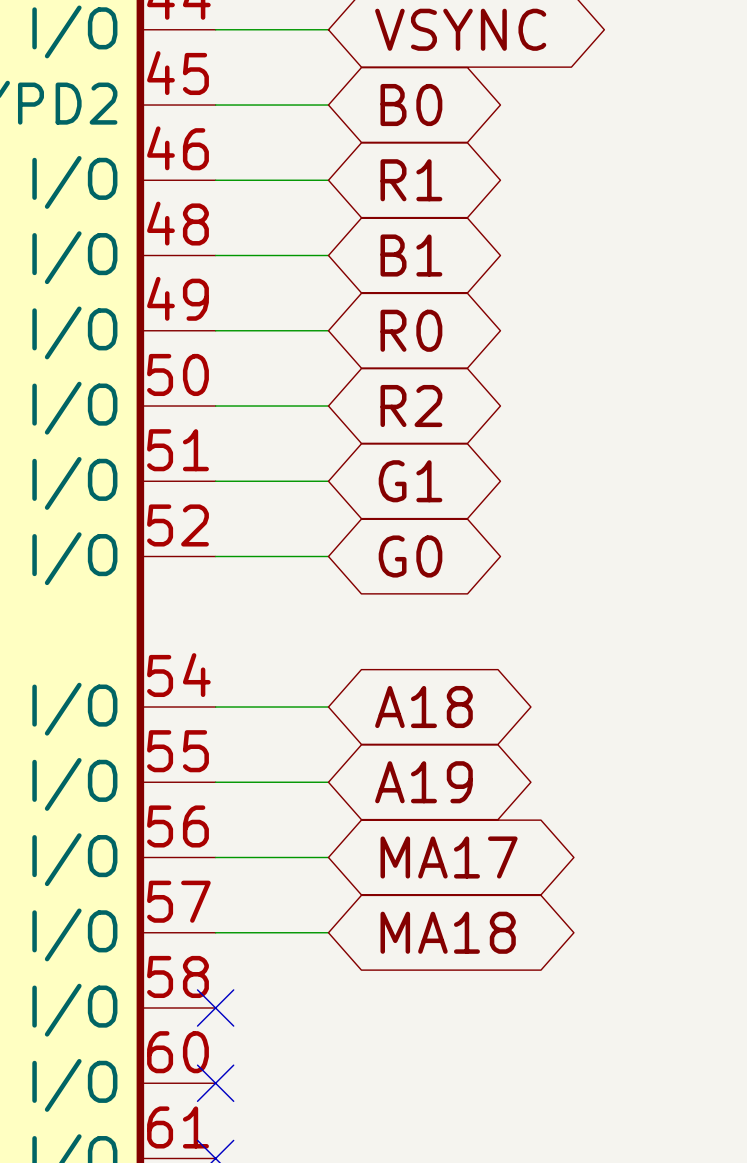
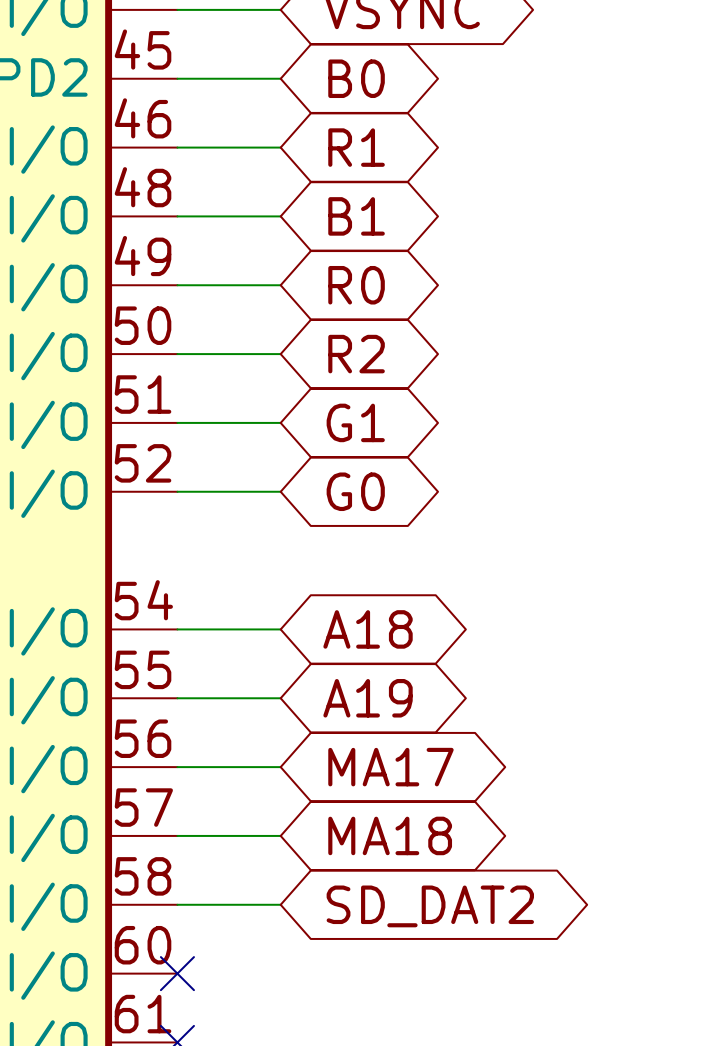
wire: none -> (177, 904) (280, 904)
no-connect mark: (215, 1007) -> none
global label: none -> SD_DAT2 (430, 906)

